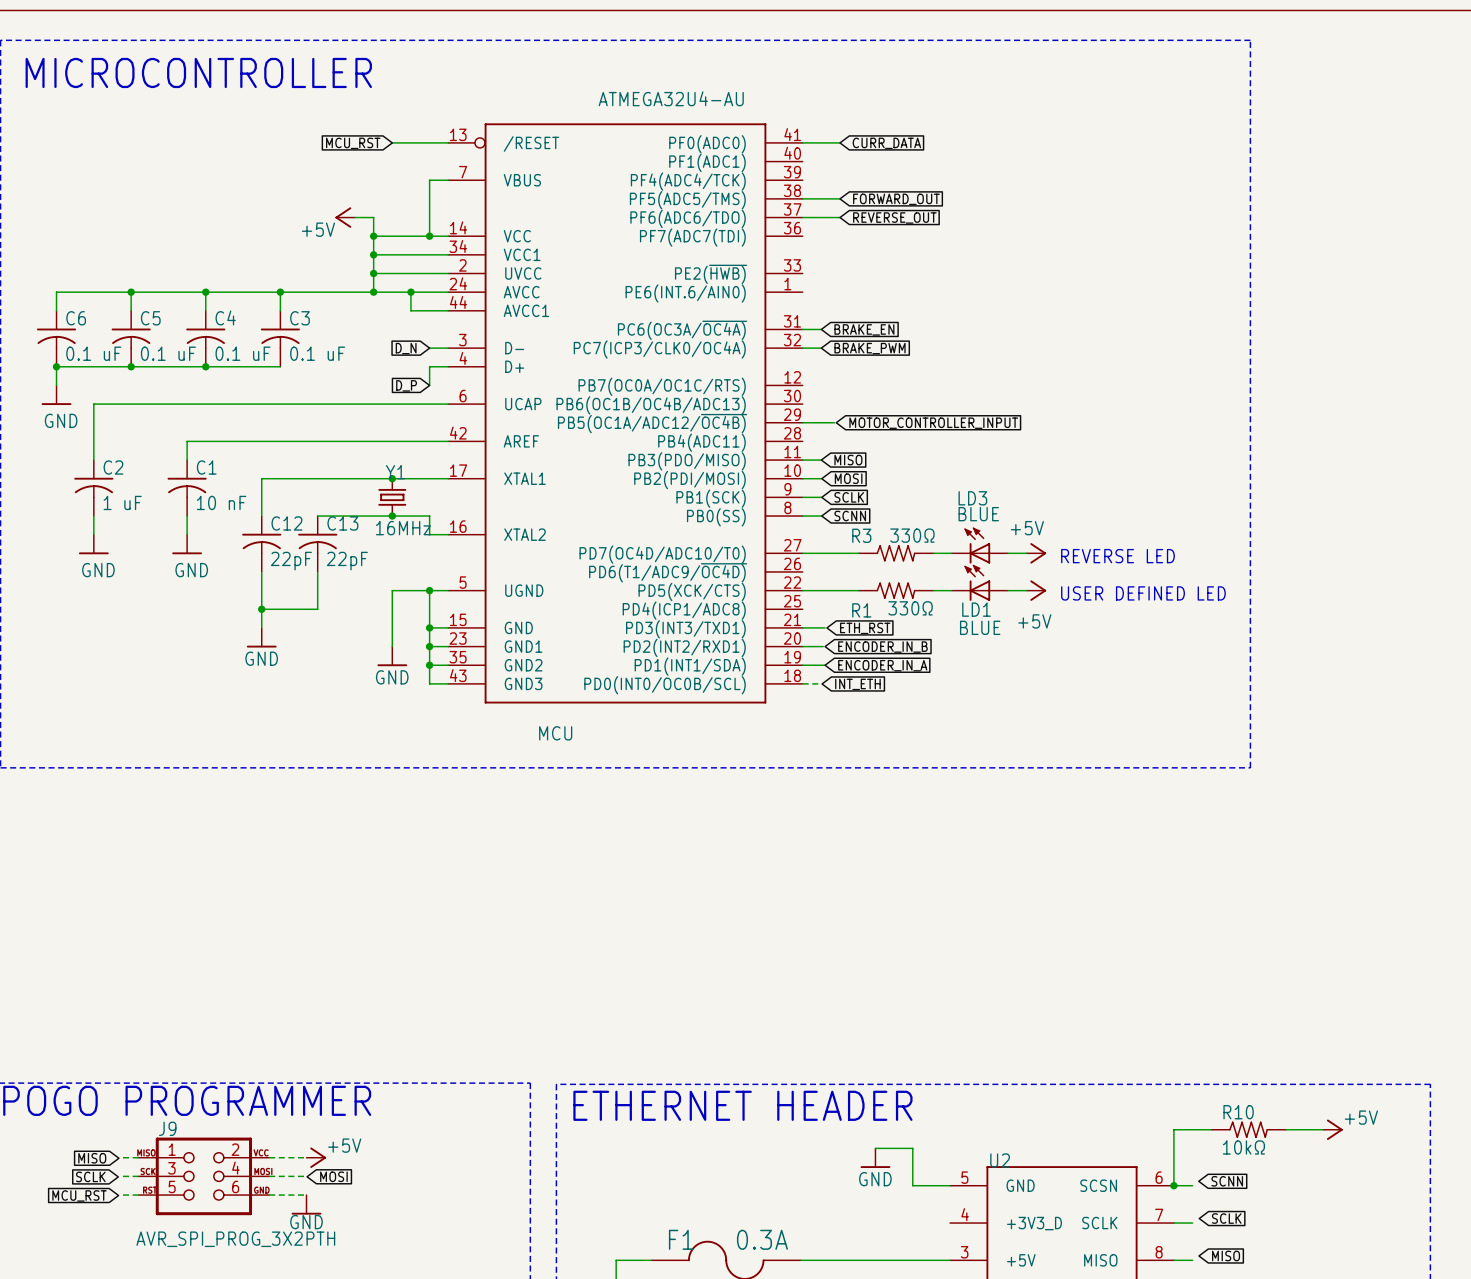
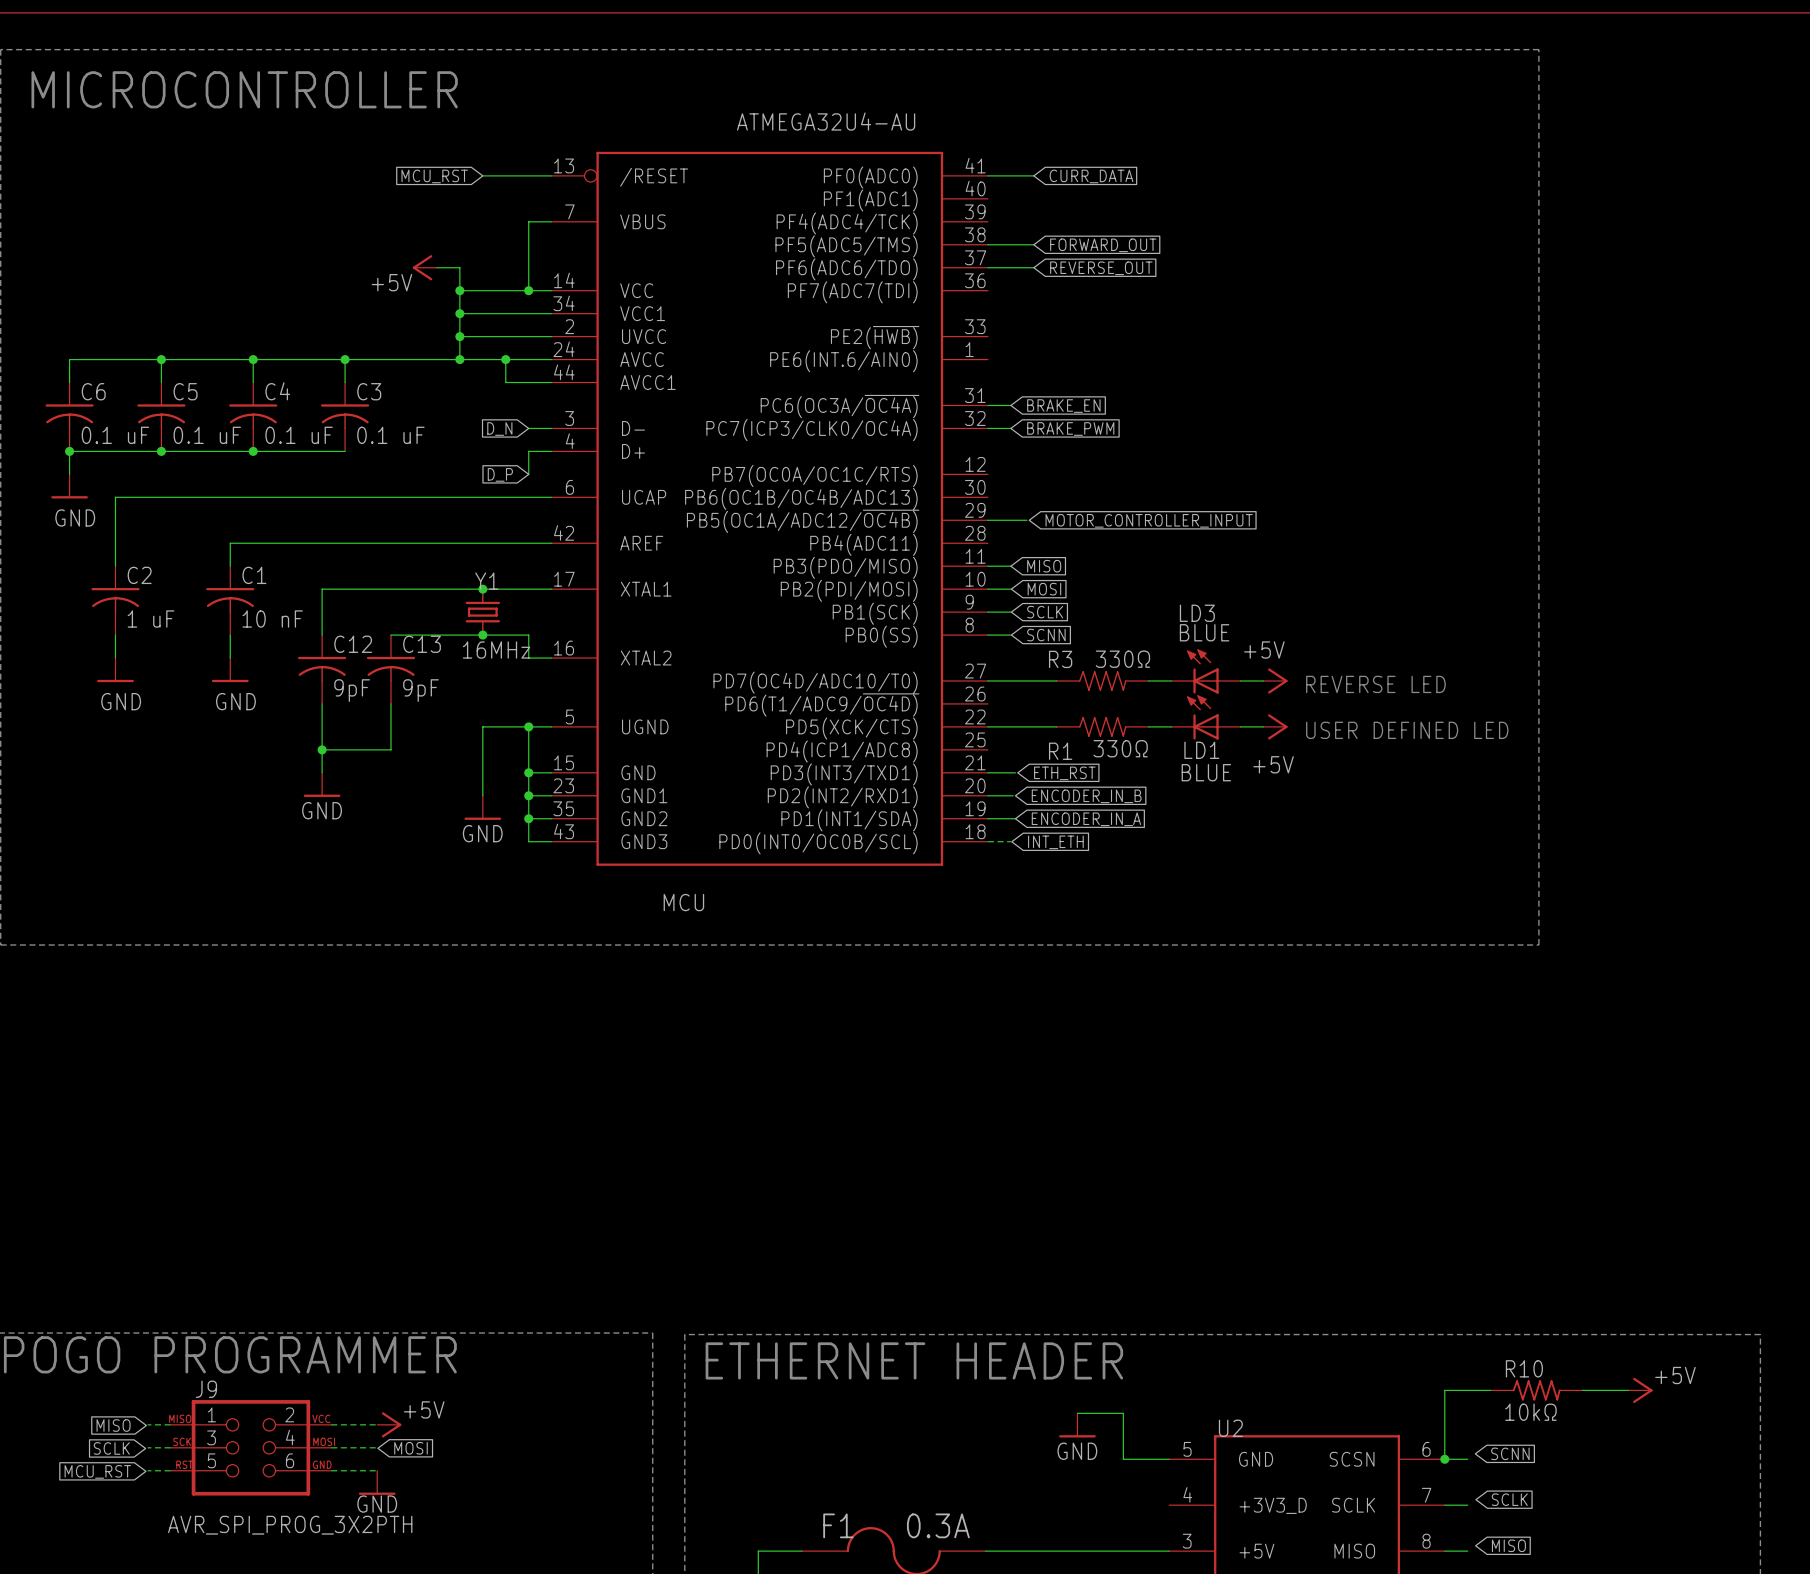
C12 value: 22pF (291, 561) -> 9pF (352, 690)
C13 value: 22pF (347, 561) -> 9pF (420, 690)

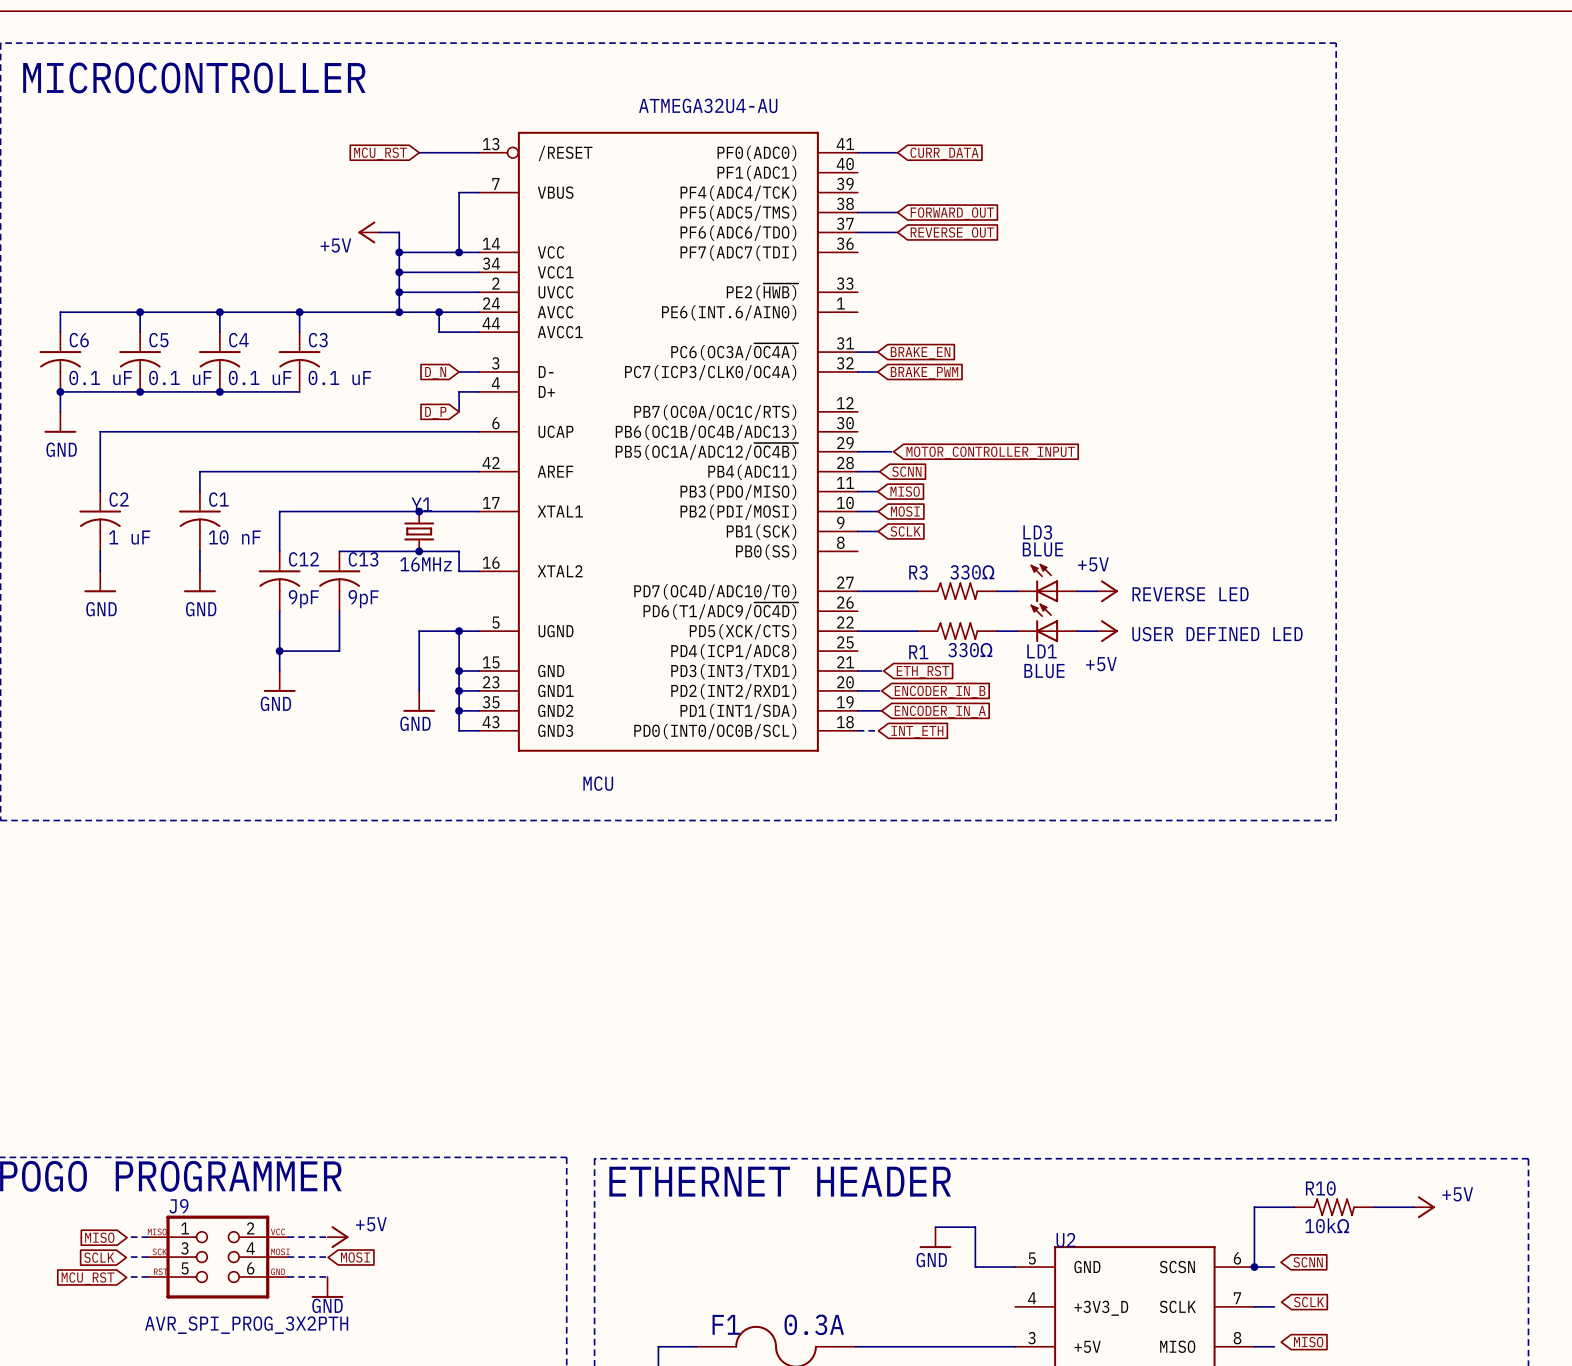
wire: none -> (857, 471) (879, 471)
wire: (987, 635) (1010, 635) -> none
global label position: SCNN (1046, 635) -> SCNN (906, 471)

